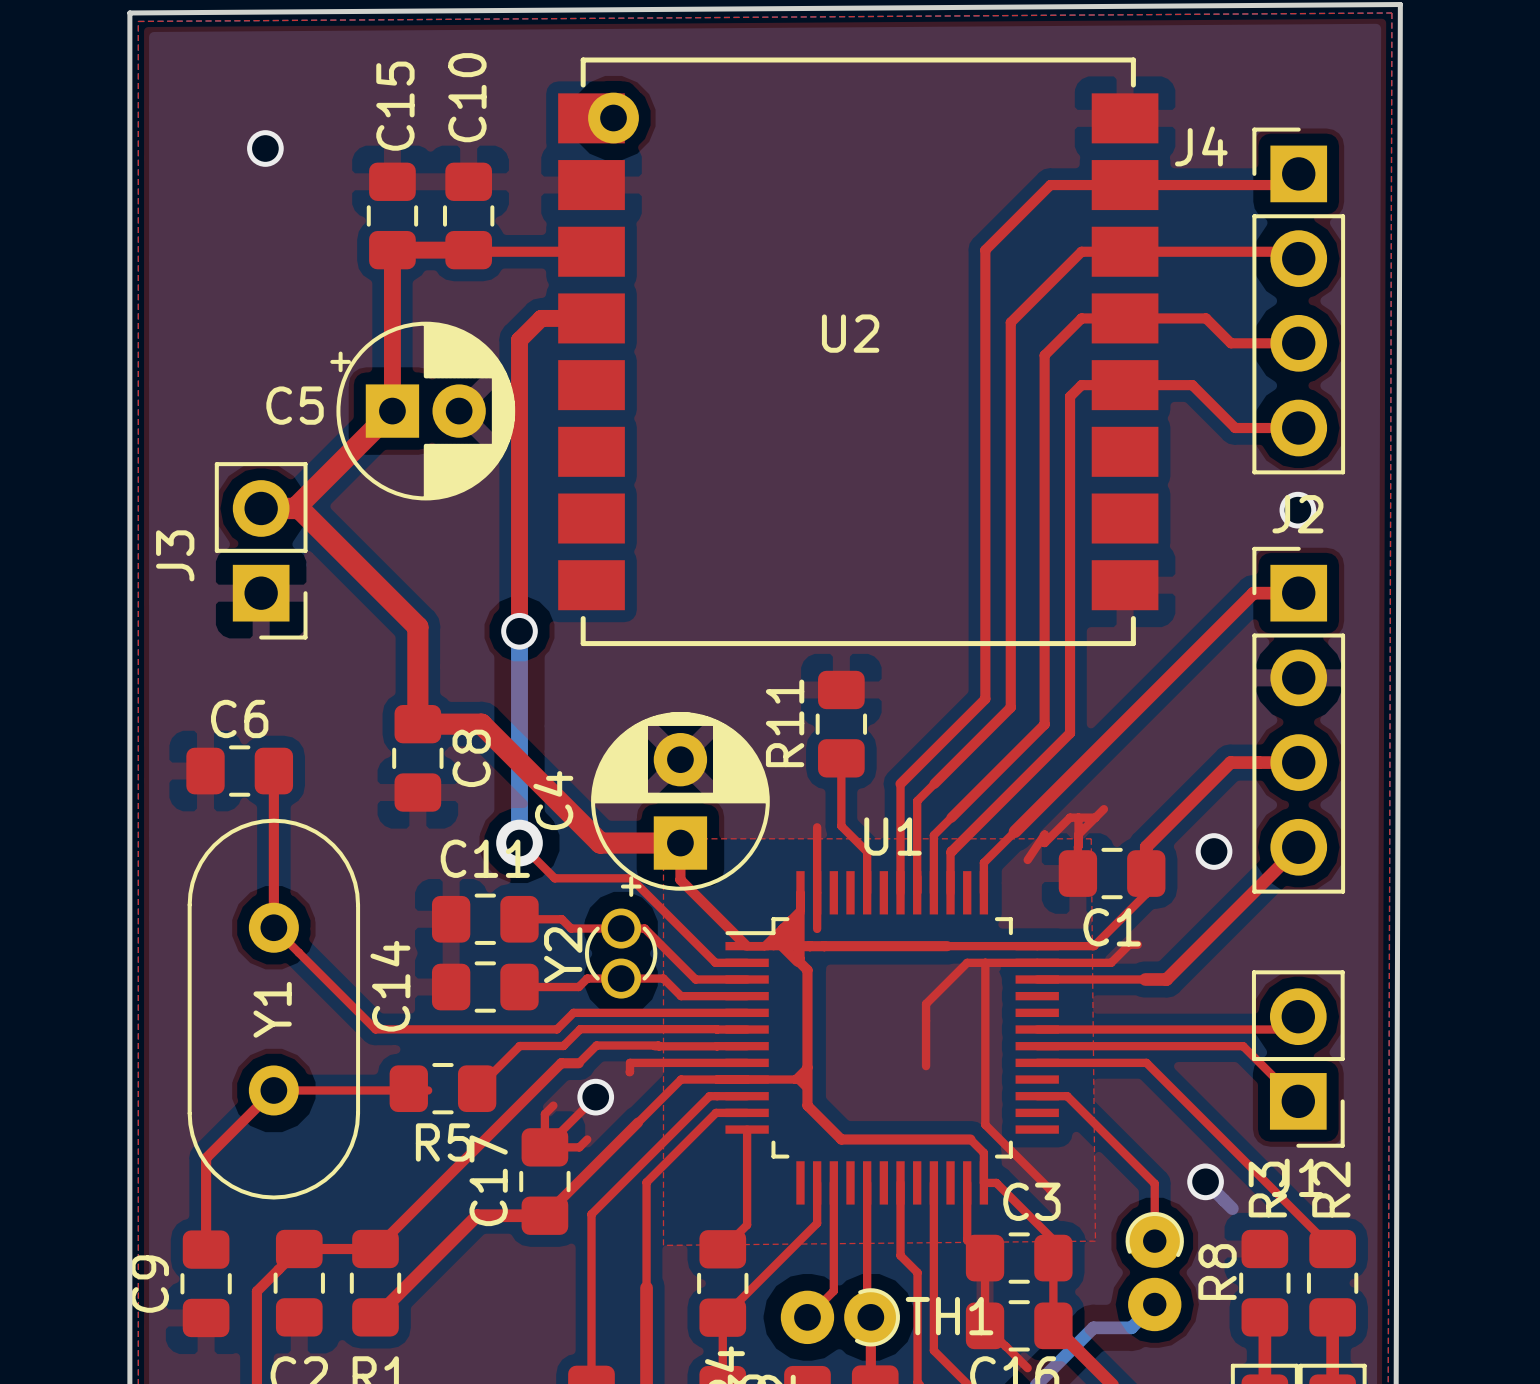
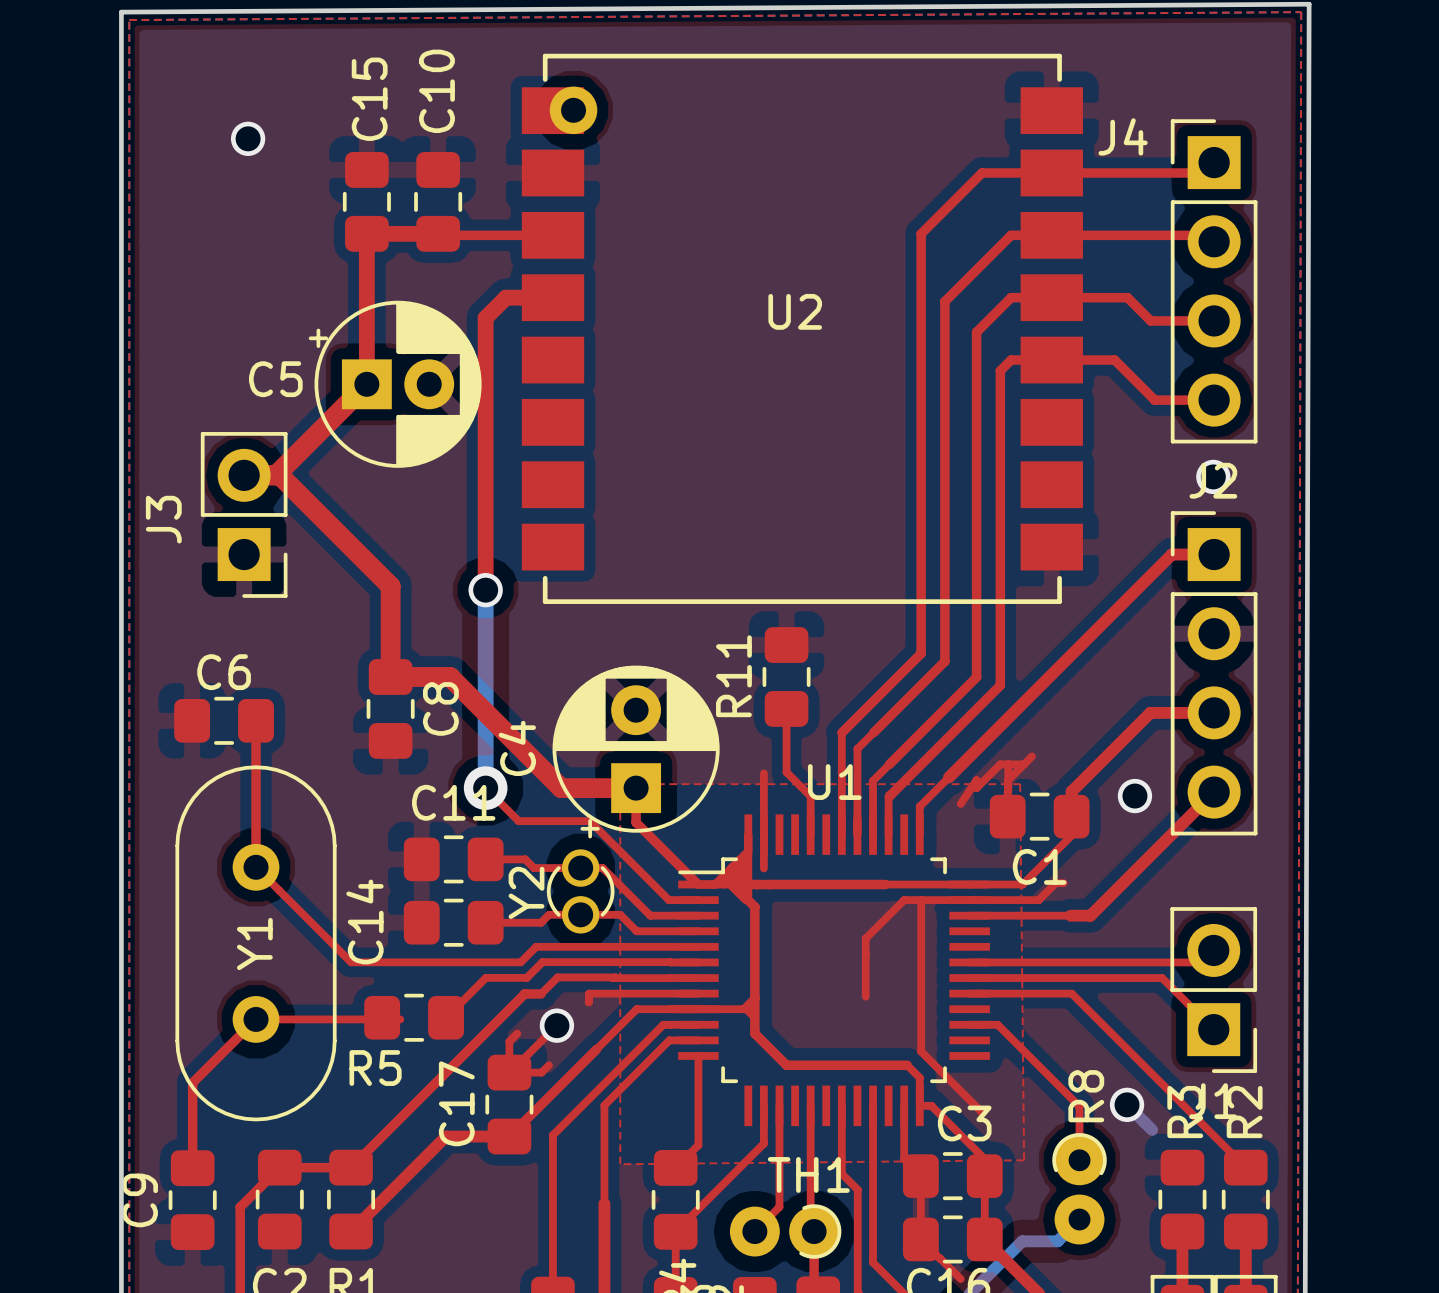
R5 name position: R5 (443, 1142) -> R5 (375, 1068)
R8 name position: R8 (1217, 1272) -> R8 (1086, 1096)
TH1 name position: TH1 (949, 1316) -> TH1 (808, 1174)

